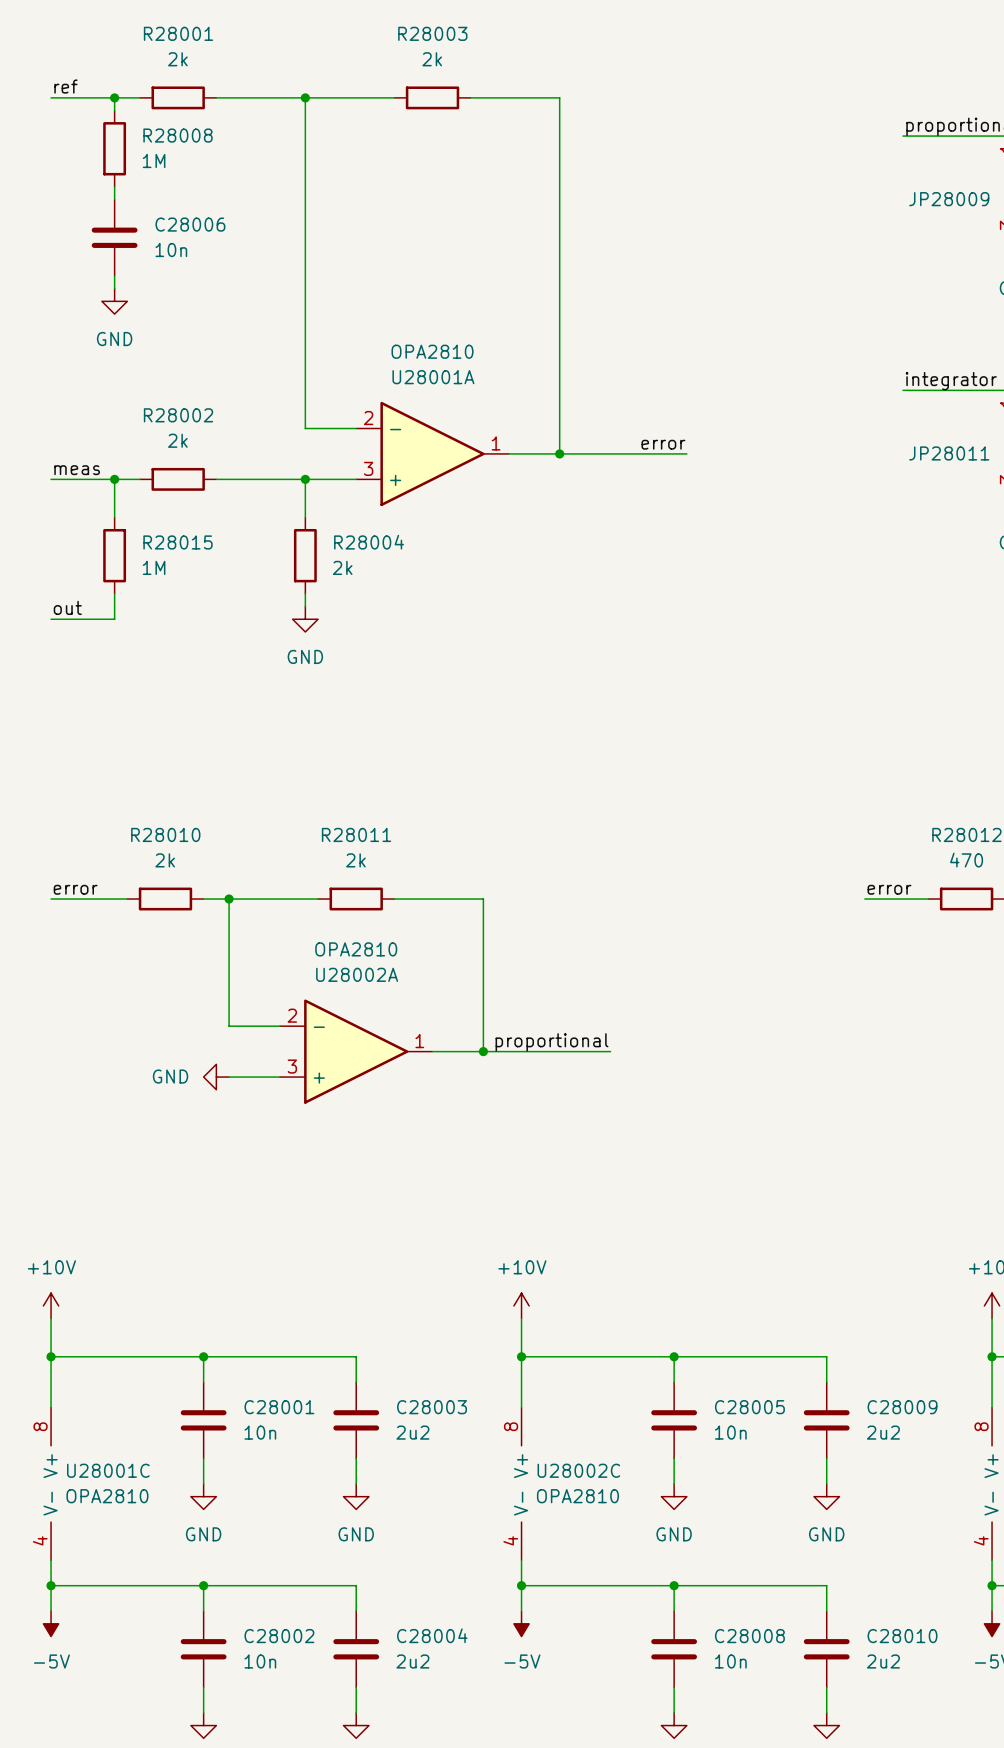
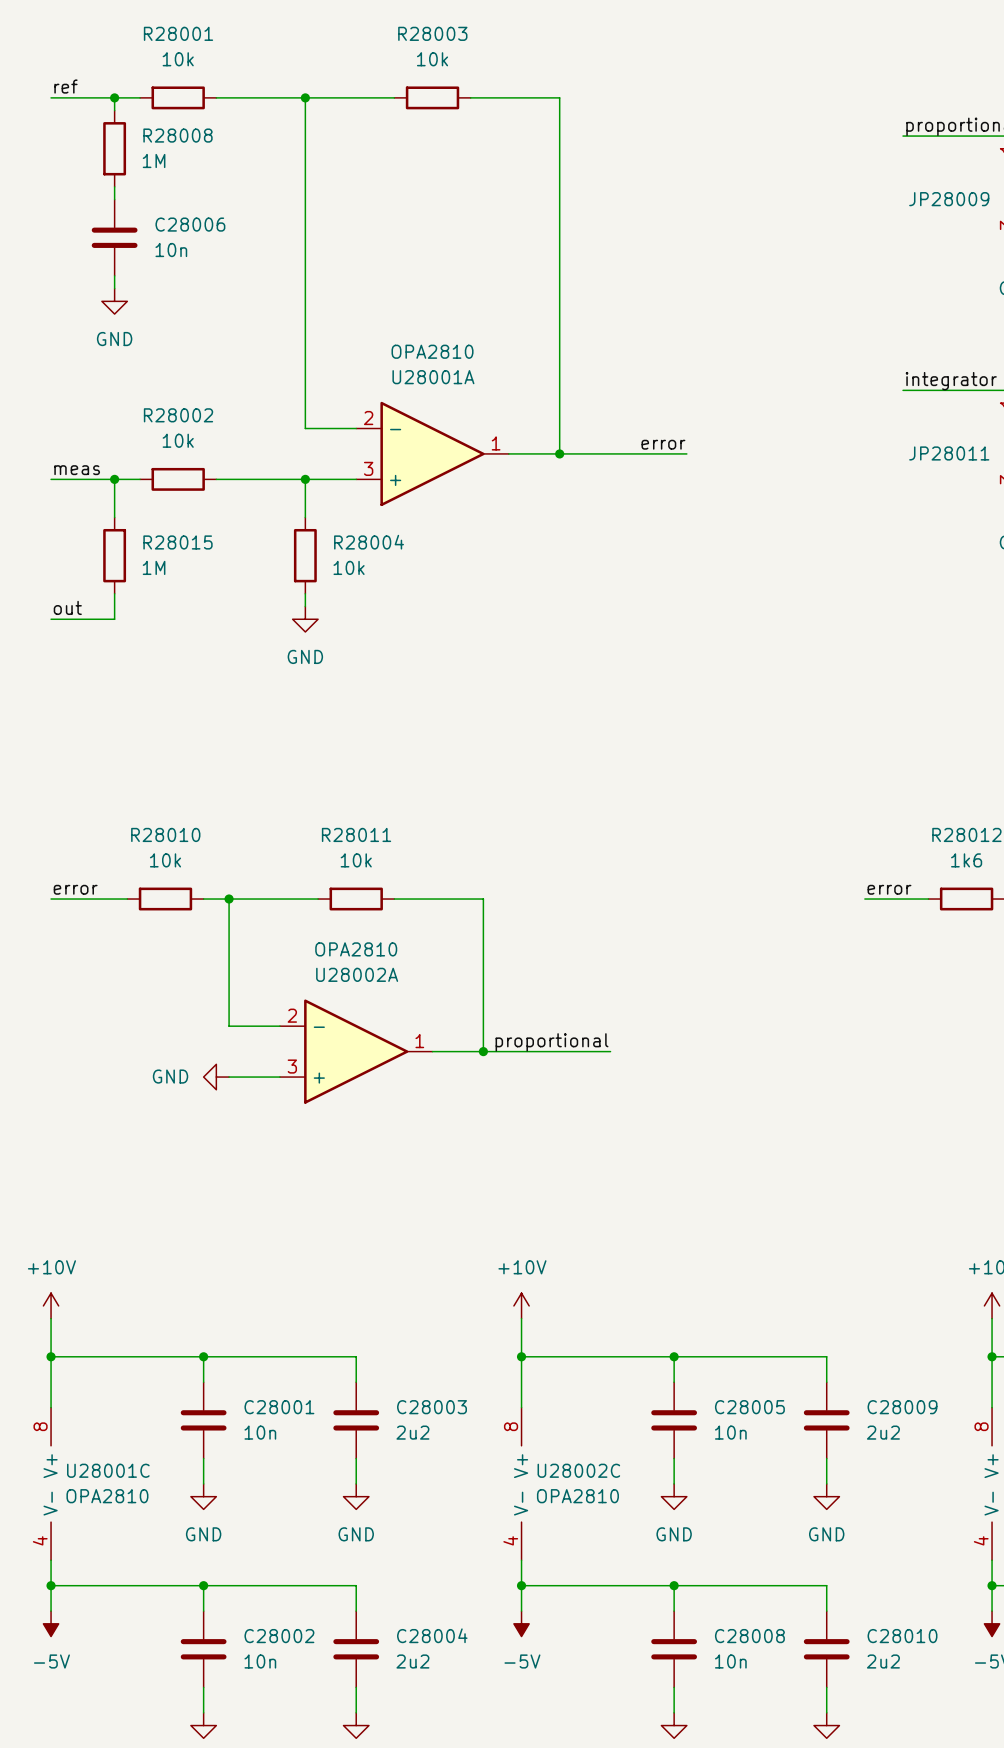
R28001 value: 2k (177, 59) -> 10k (178, 59)
R28003 value: 2k (432, 59) -> 10k (432, 59)
R28002 value: 2k (177, 440) -> 10k (178, 440)
R28004 value: 2k (342, 567) -> 10k (349, 567)
R28010 value: 2k (165, 860) -> 10k (165, 860)
R28011 value: 2k (355, 860) -> 10k (356, 860)
R28012 value: 470 (966, 860) -> 1k6 (966, 860)

